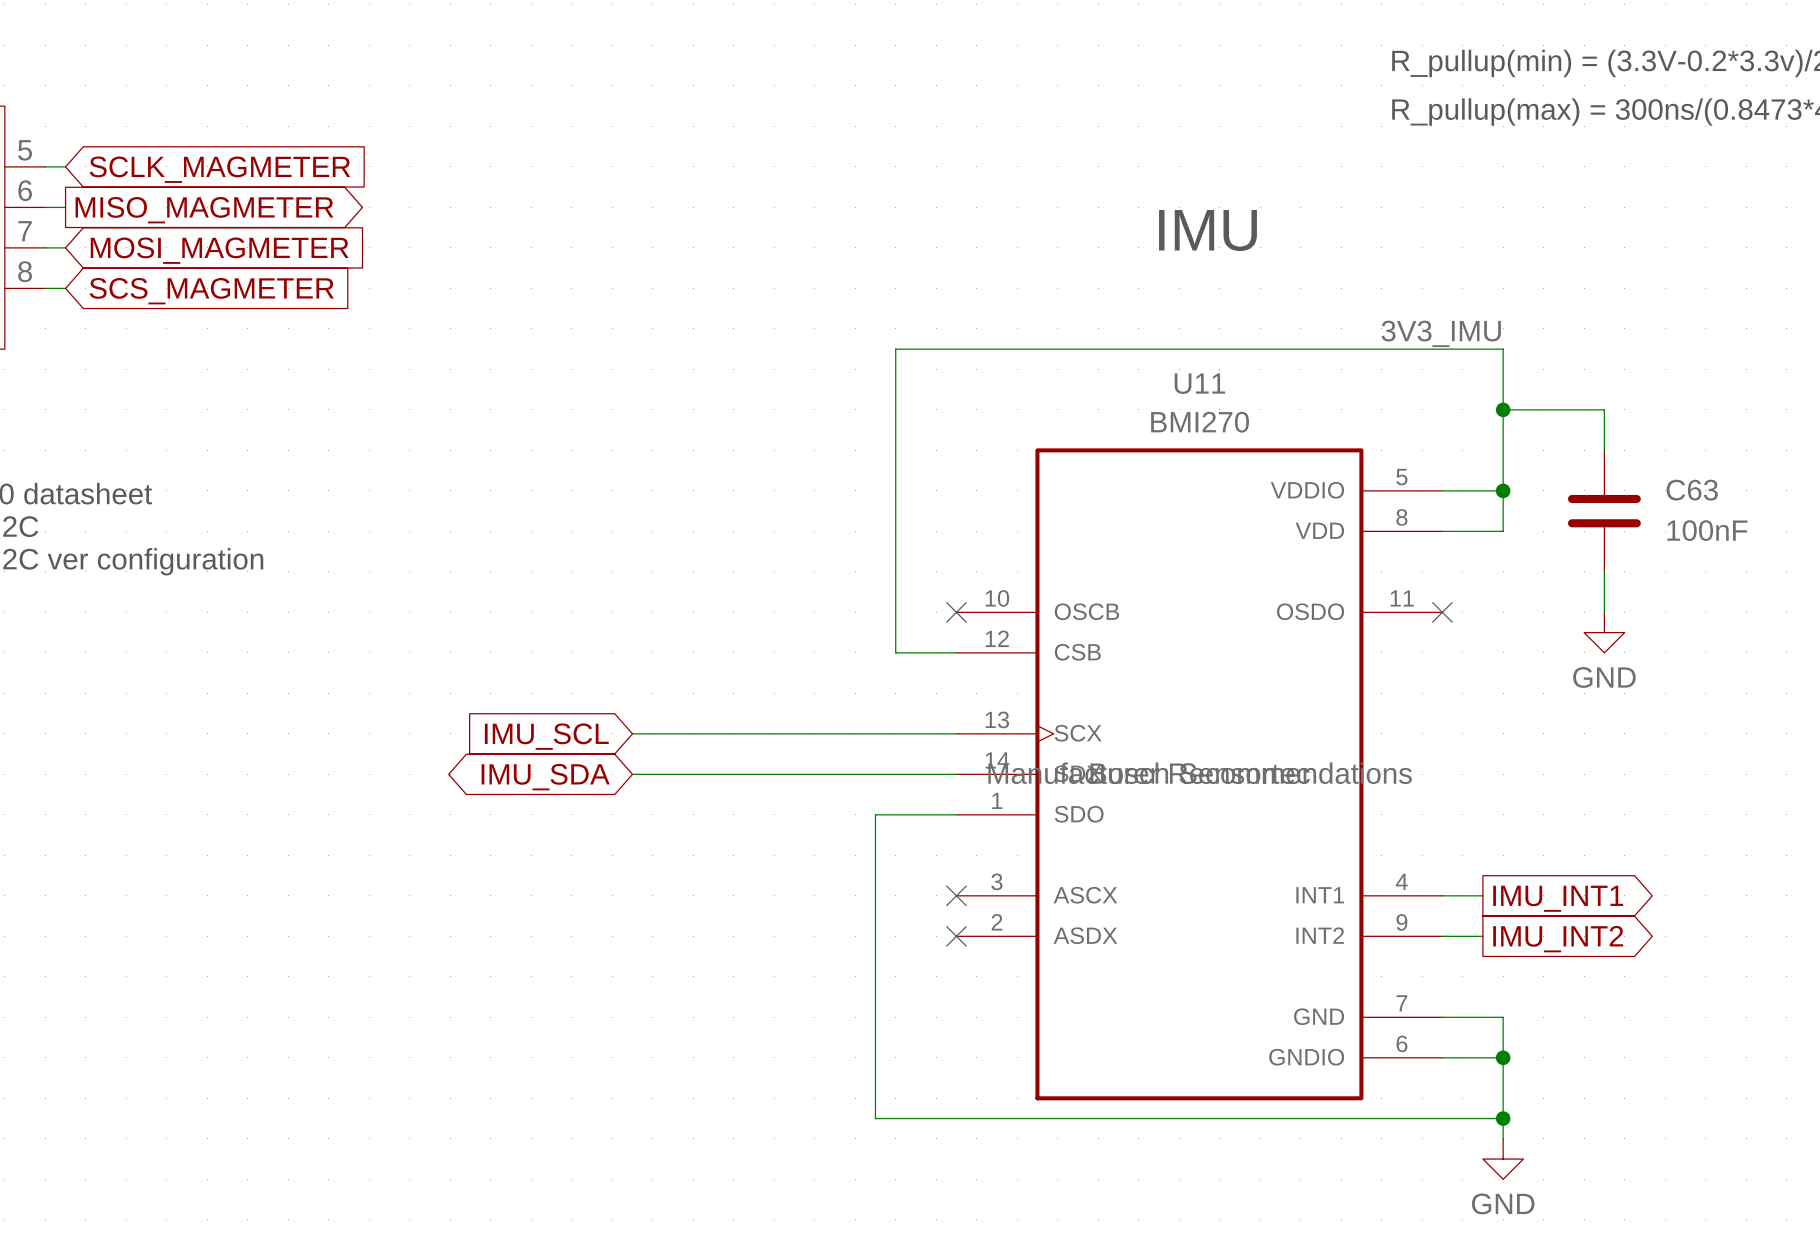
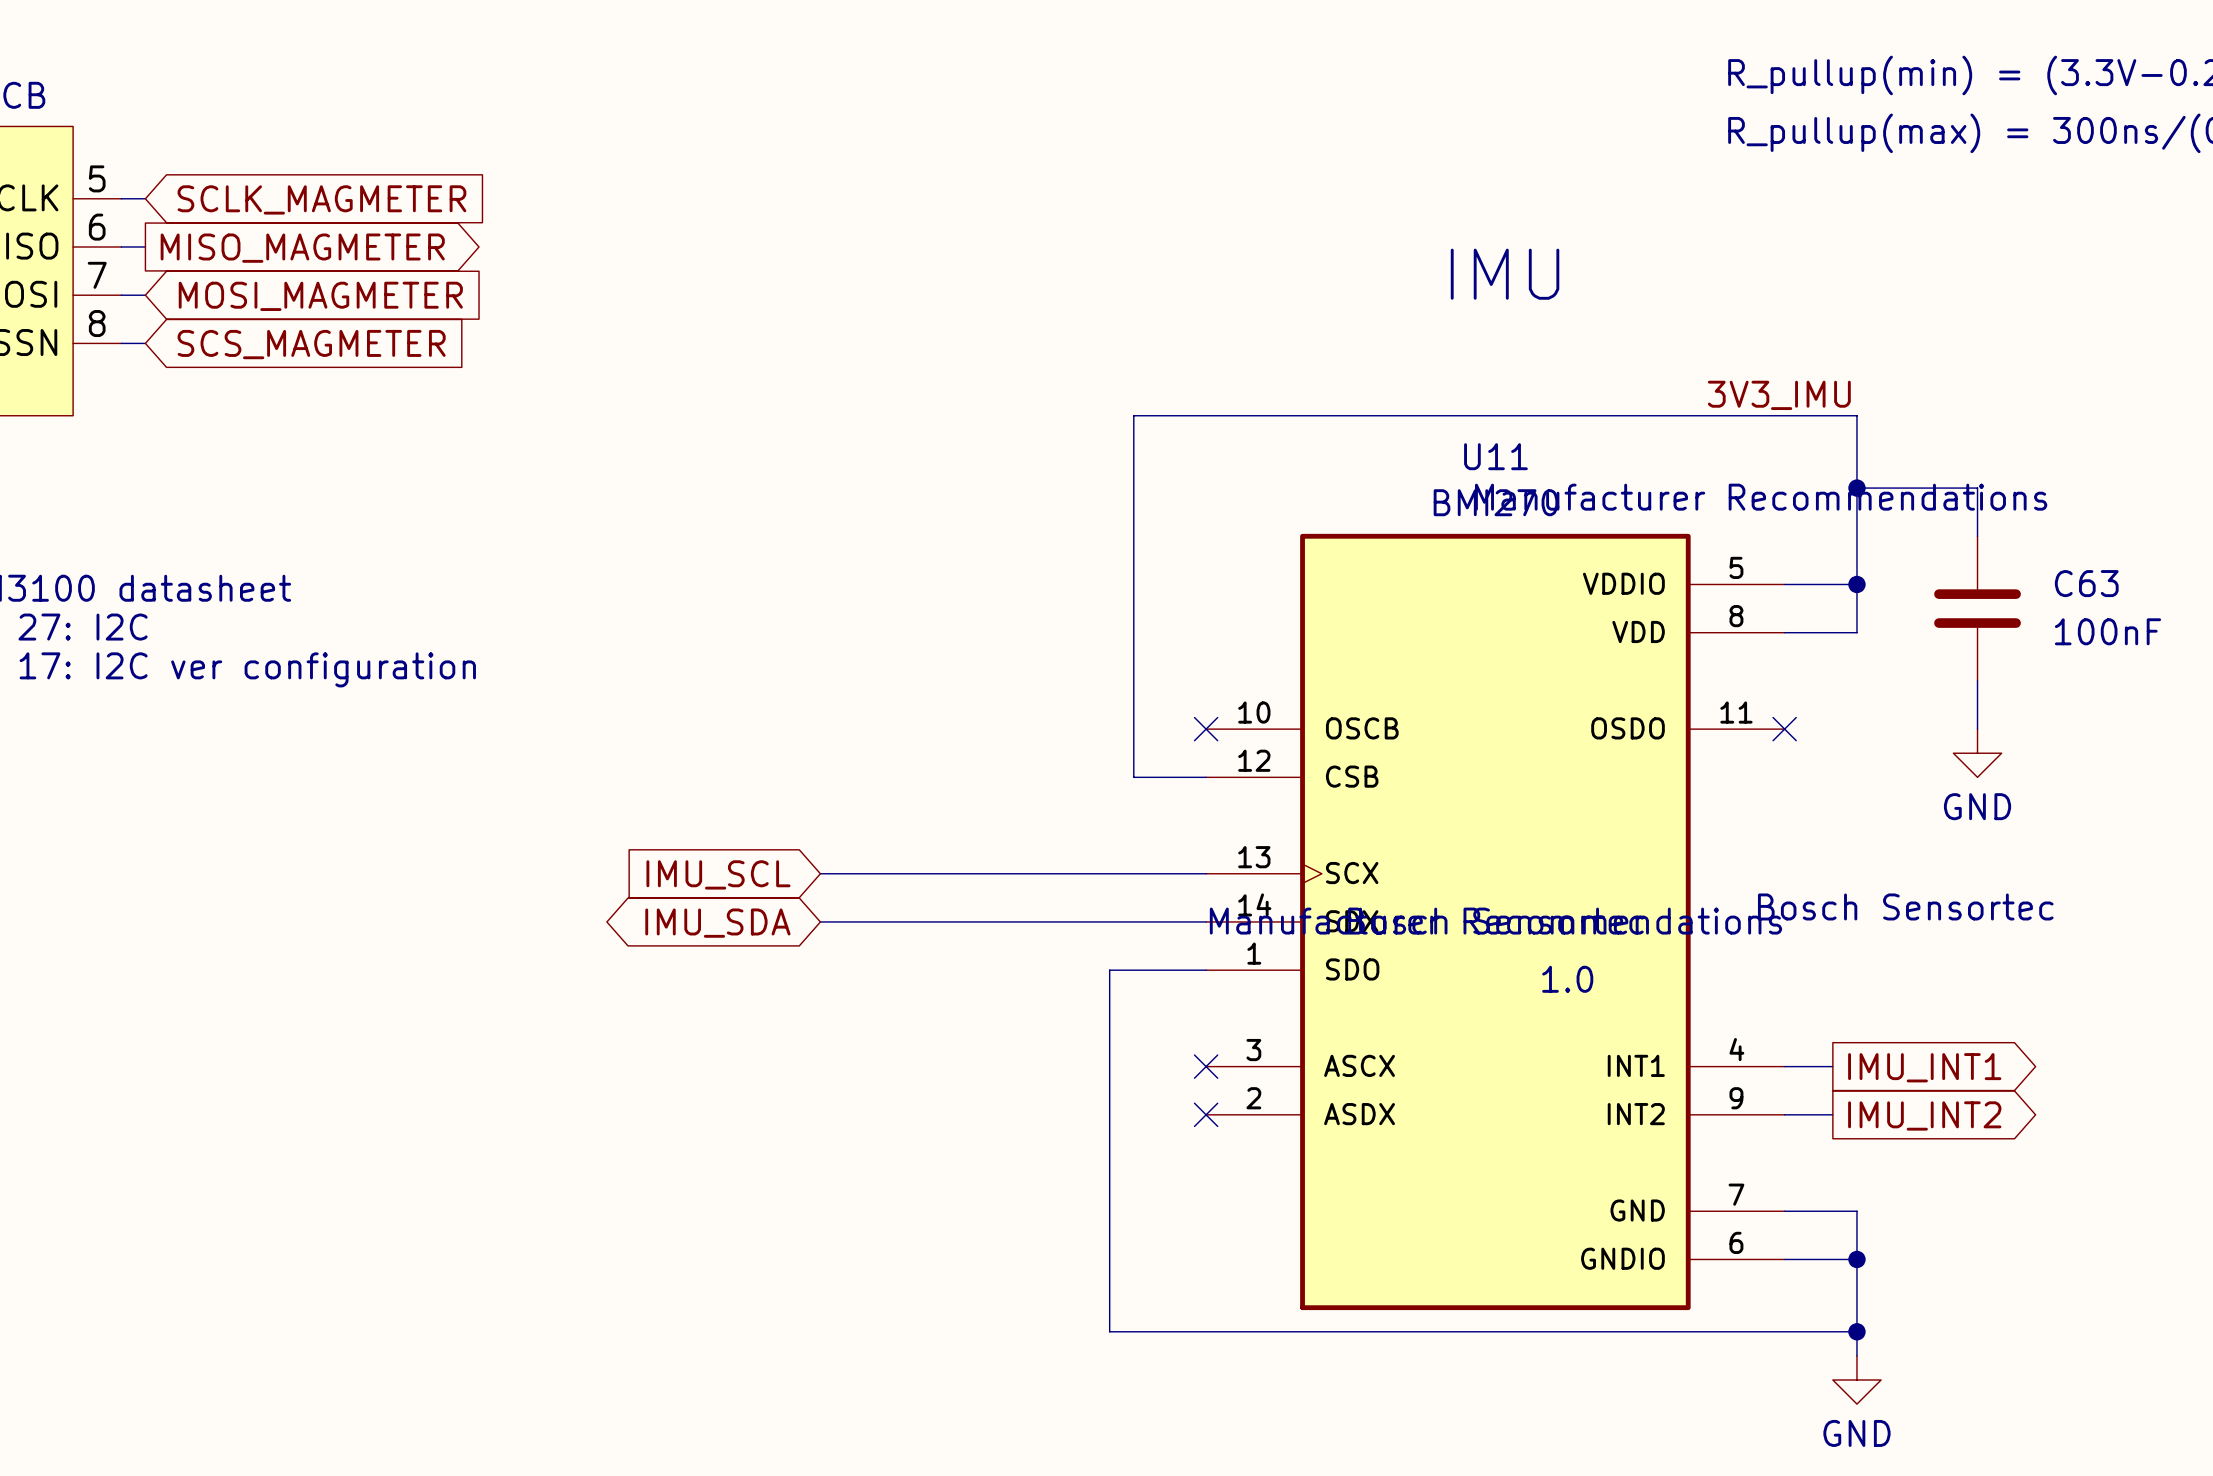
U11 text: none -> Manufacturer Recommendations (1761, 497)
U11 text: none -> Bosch Sensortec (1905, 906)
U11 text: none -> 1.0 (1567, 979)

